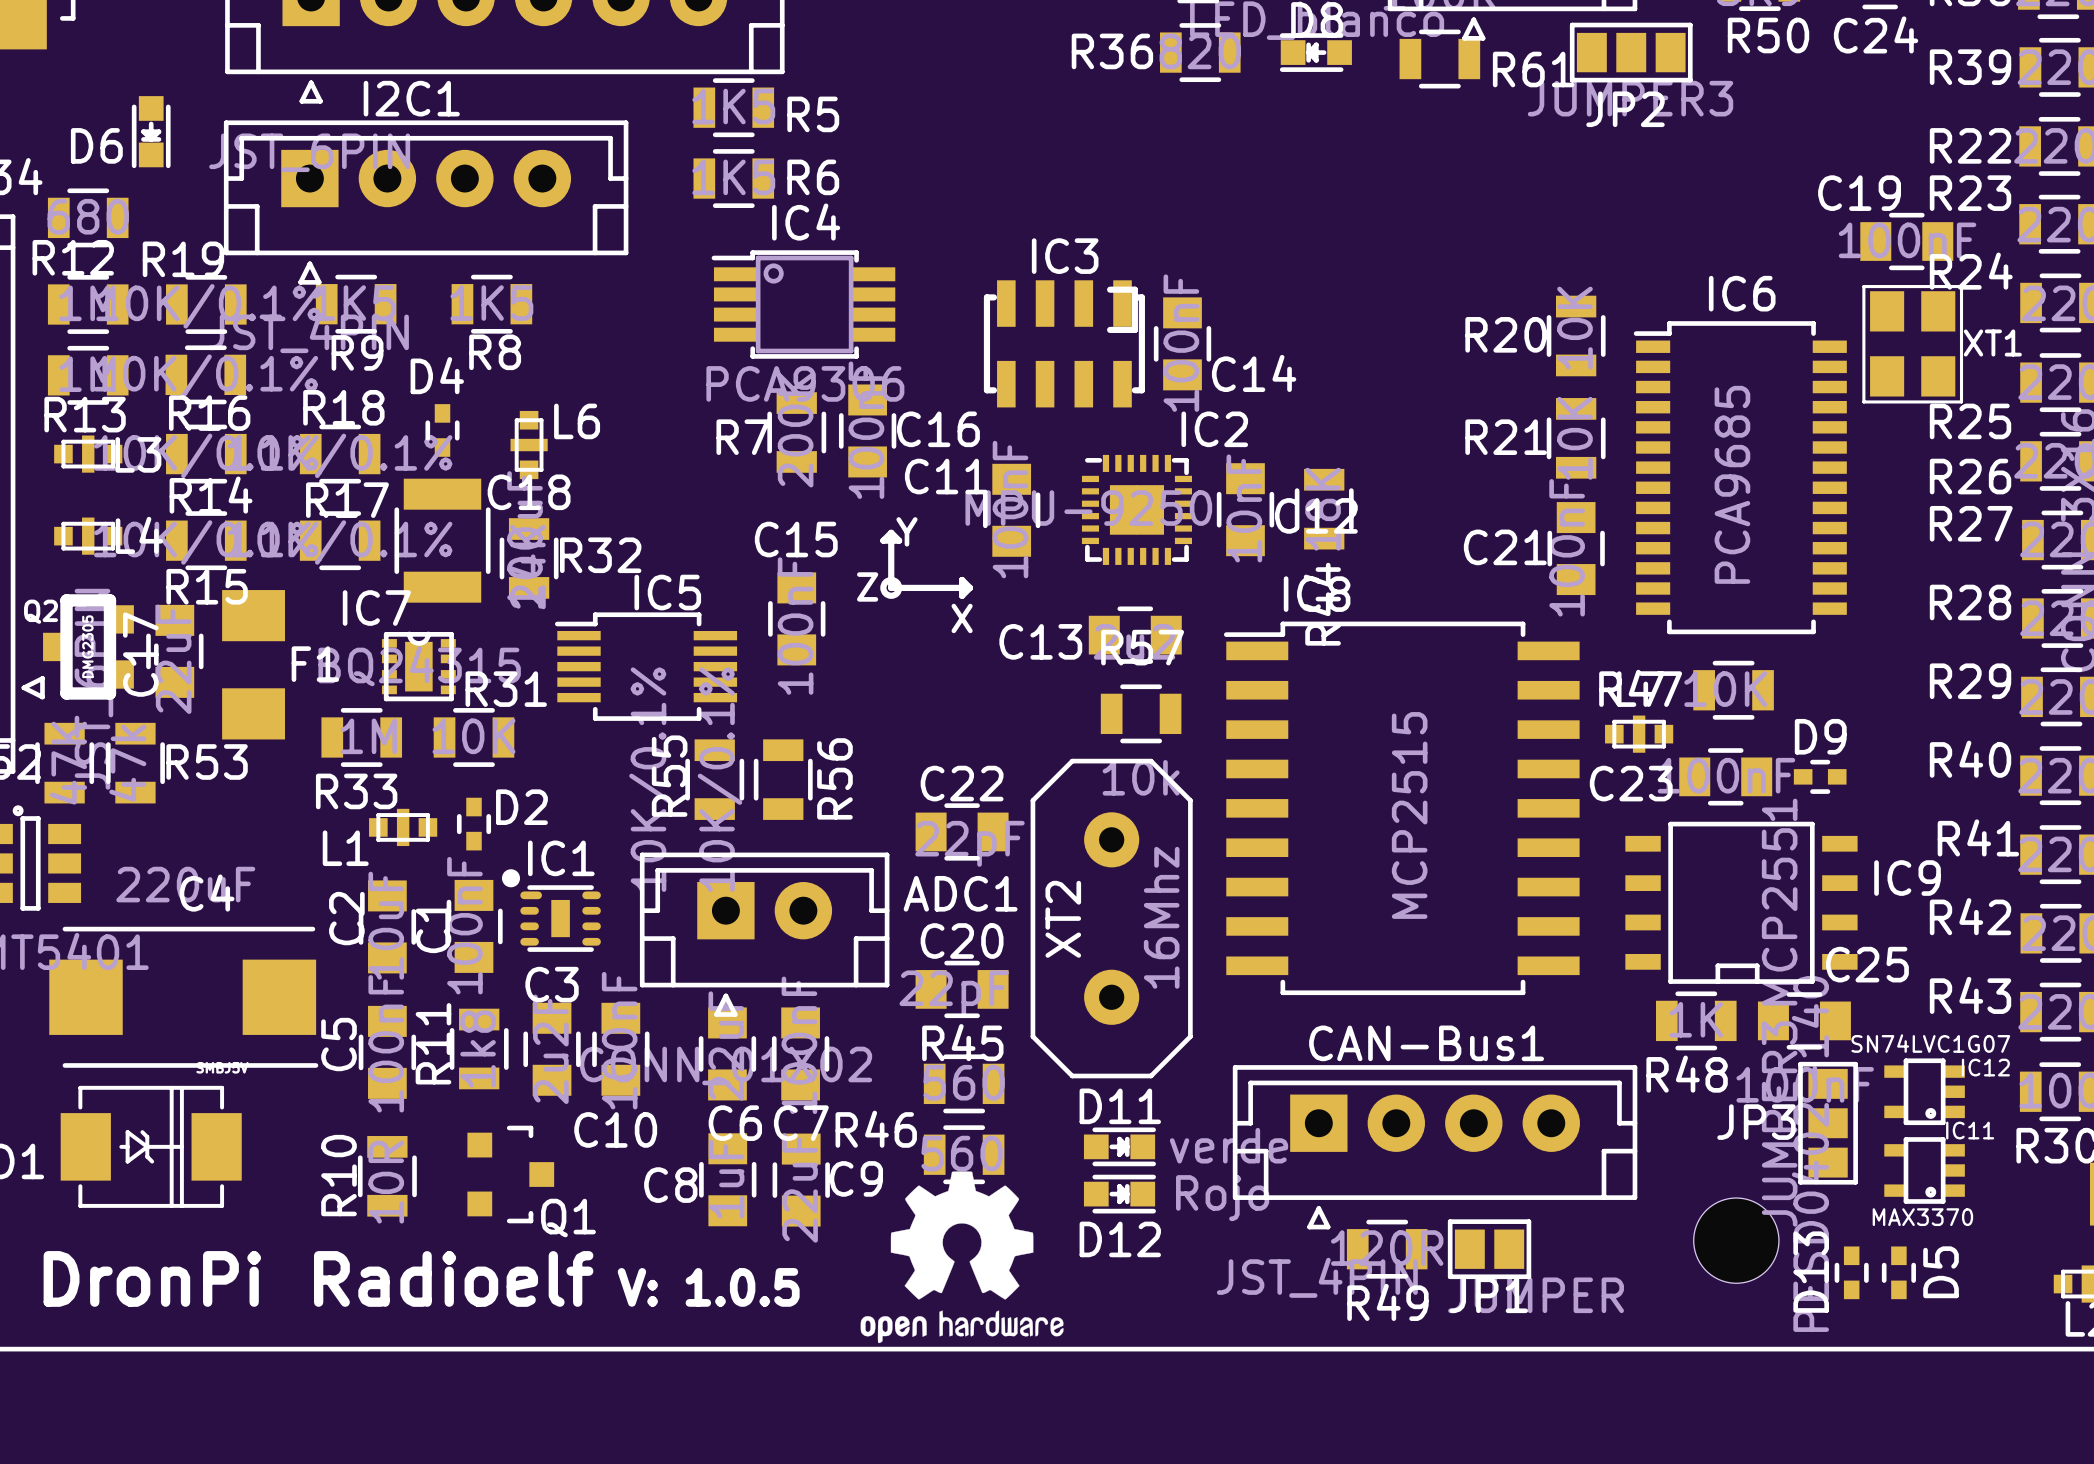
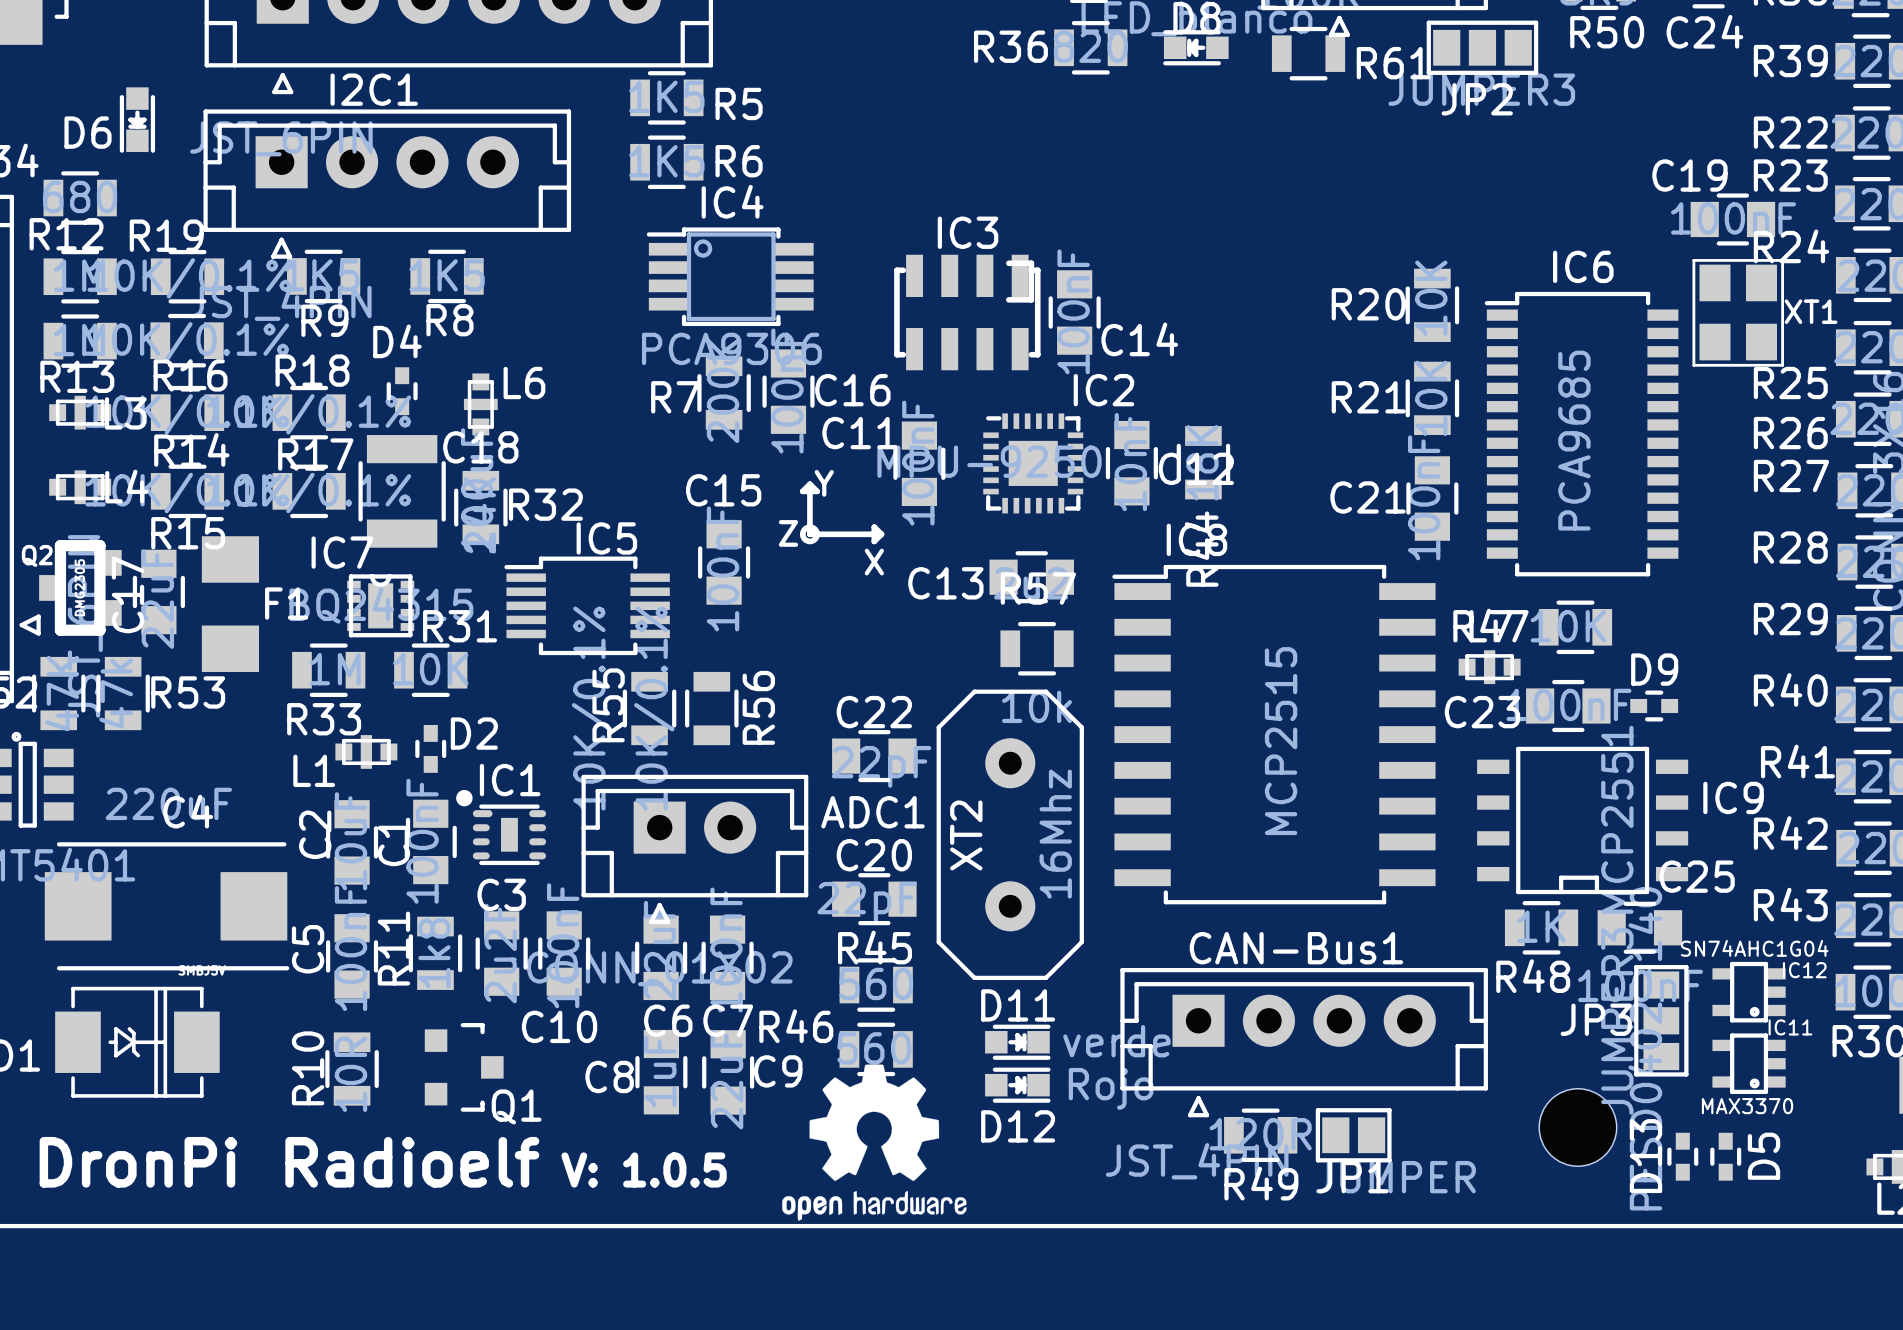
IC12 value: SN74LVC1G07 (1930, 1043) -> SN74AHC1G04 (1754, 948)

